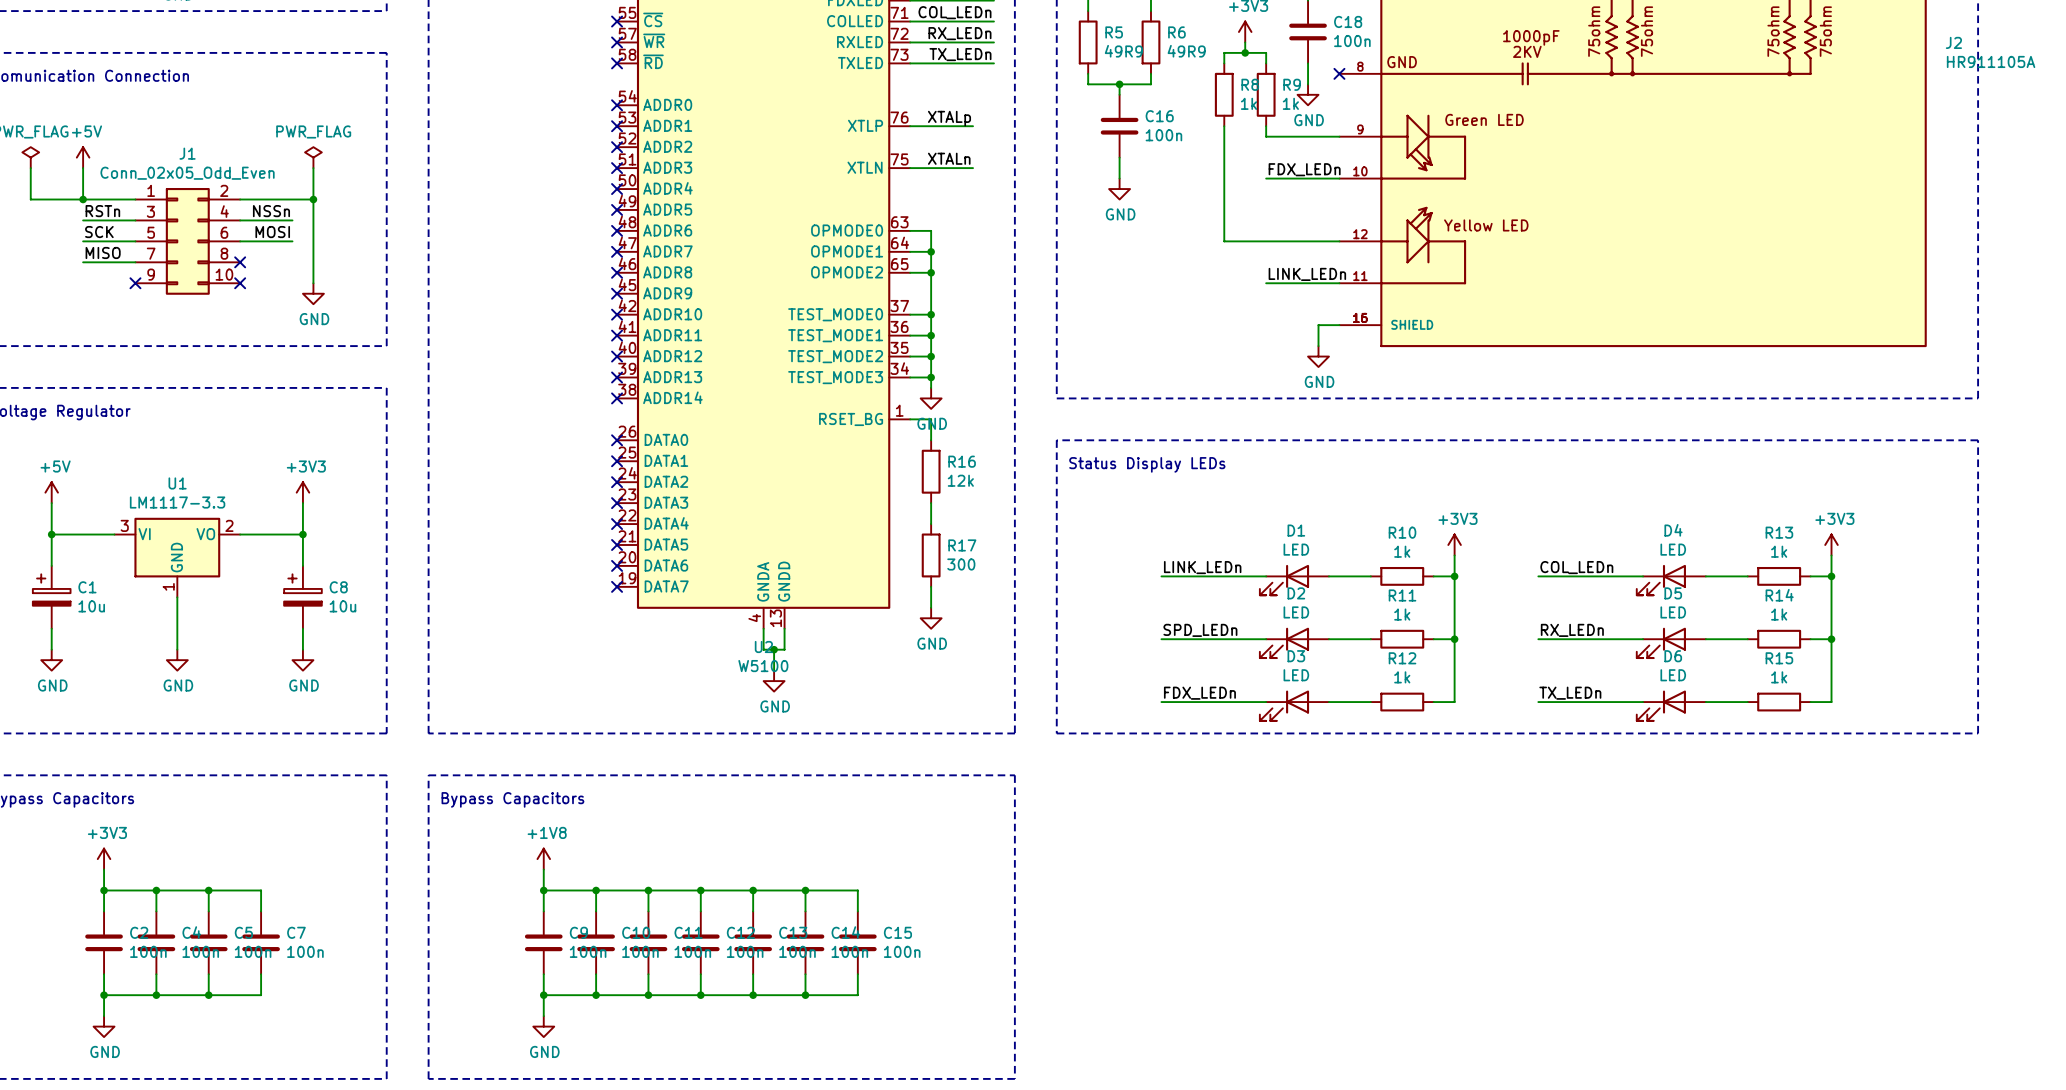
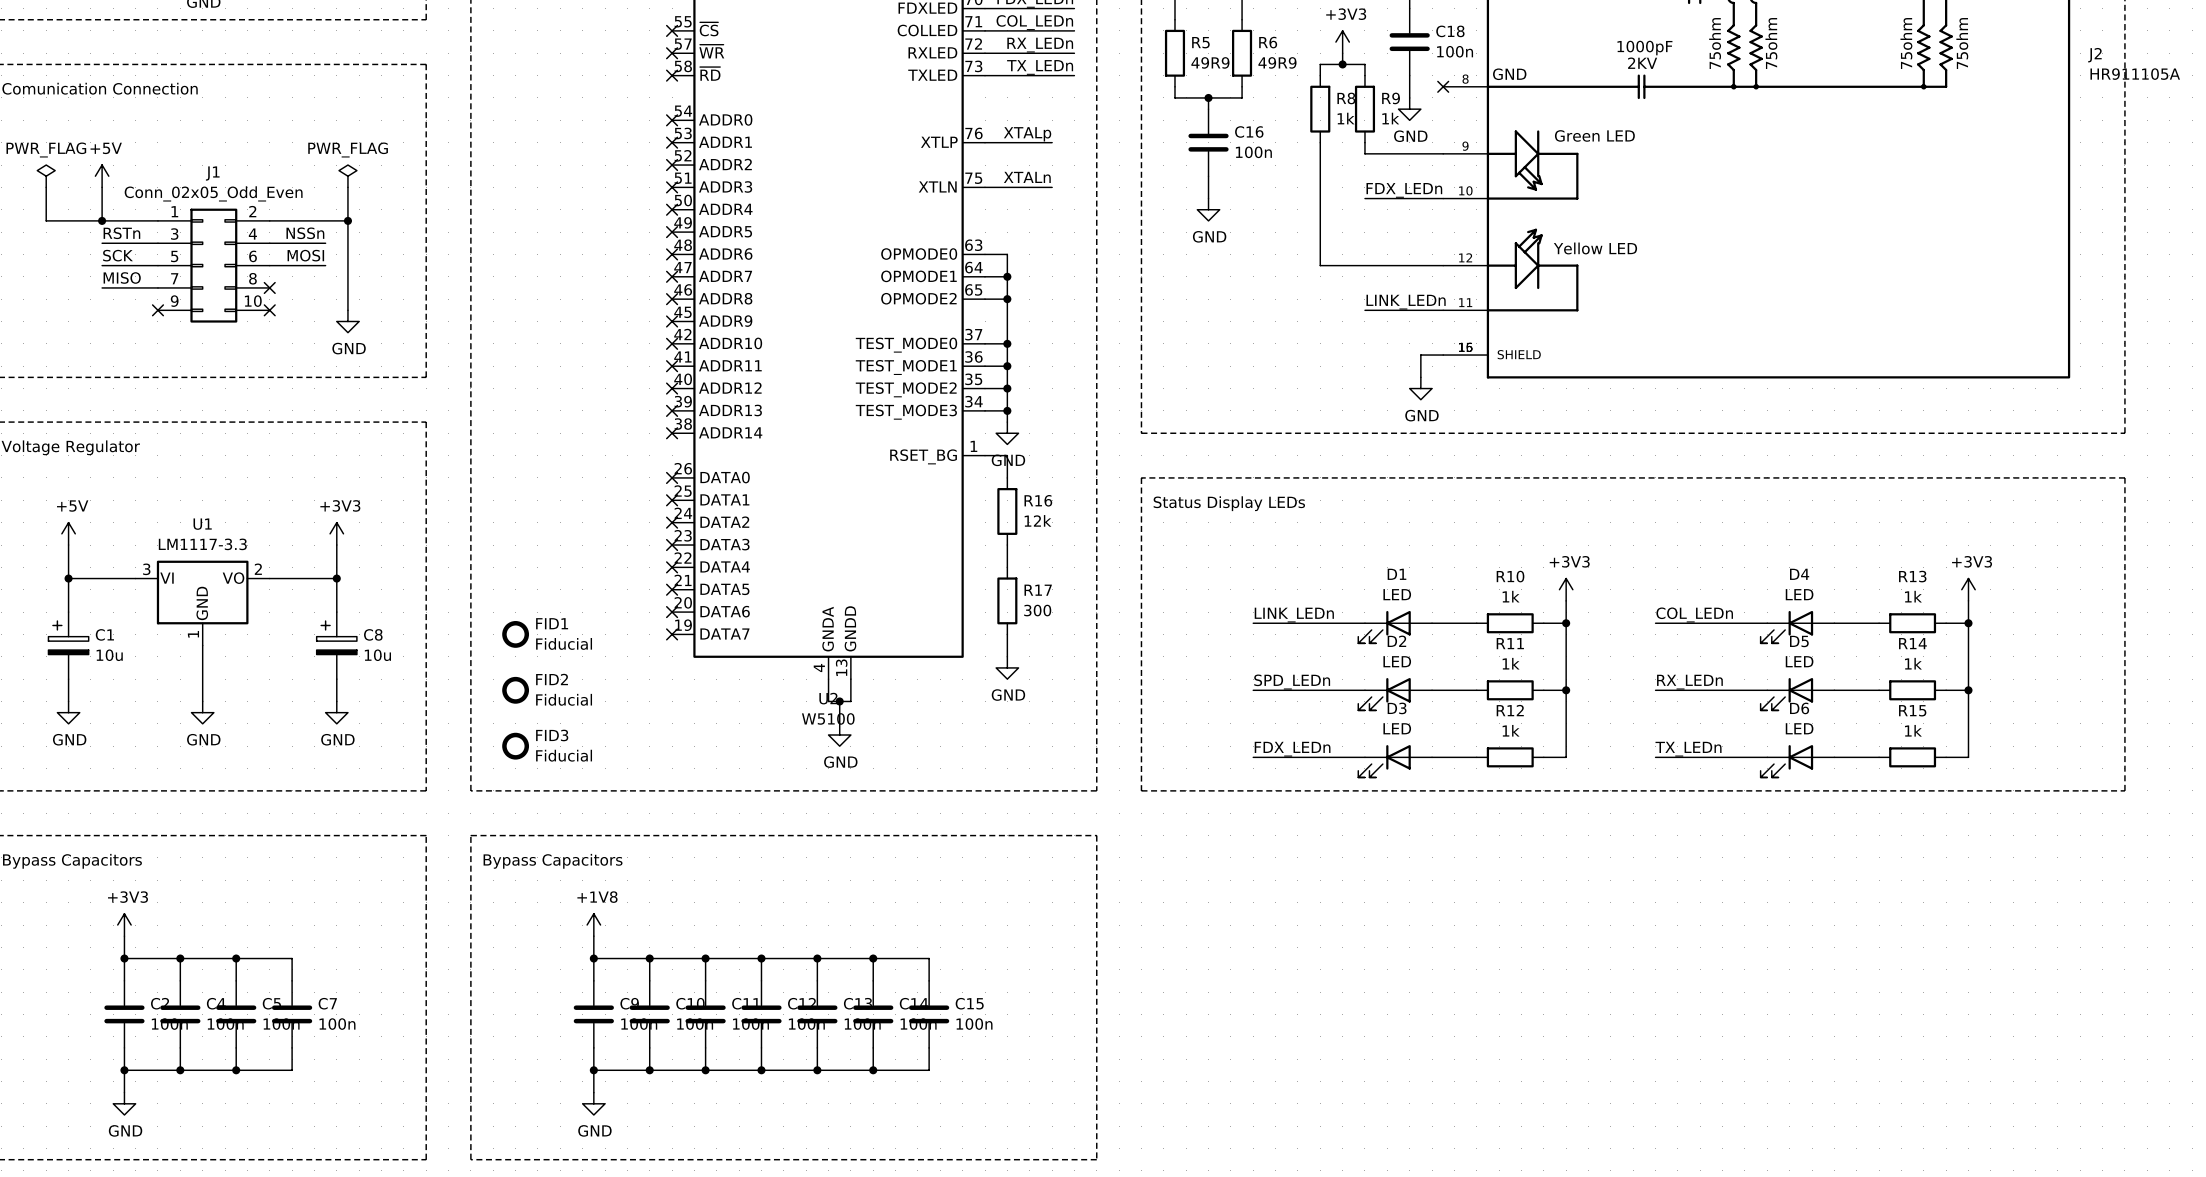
FID1: none -> Fiducial (515, 634)
FID2: none -> Fiducial (515, 690)
FID3: none -> Fiducial (515, 746)

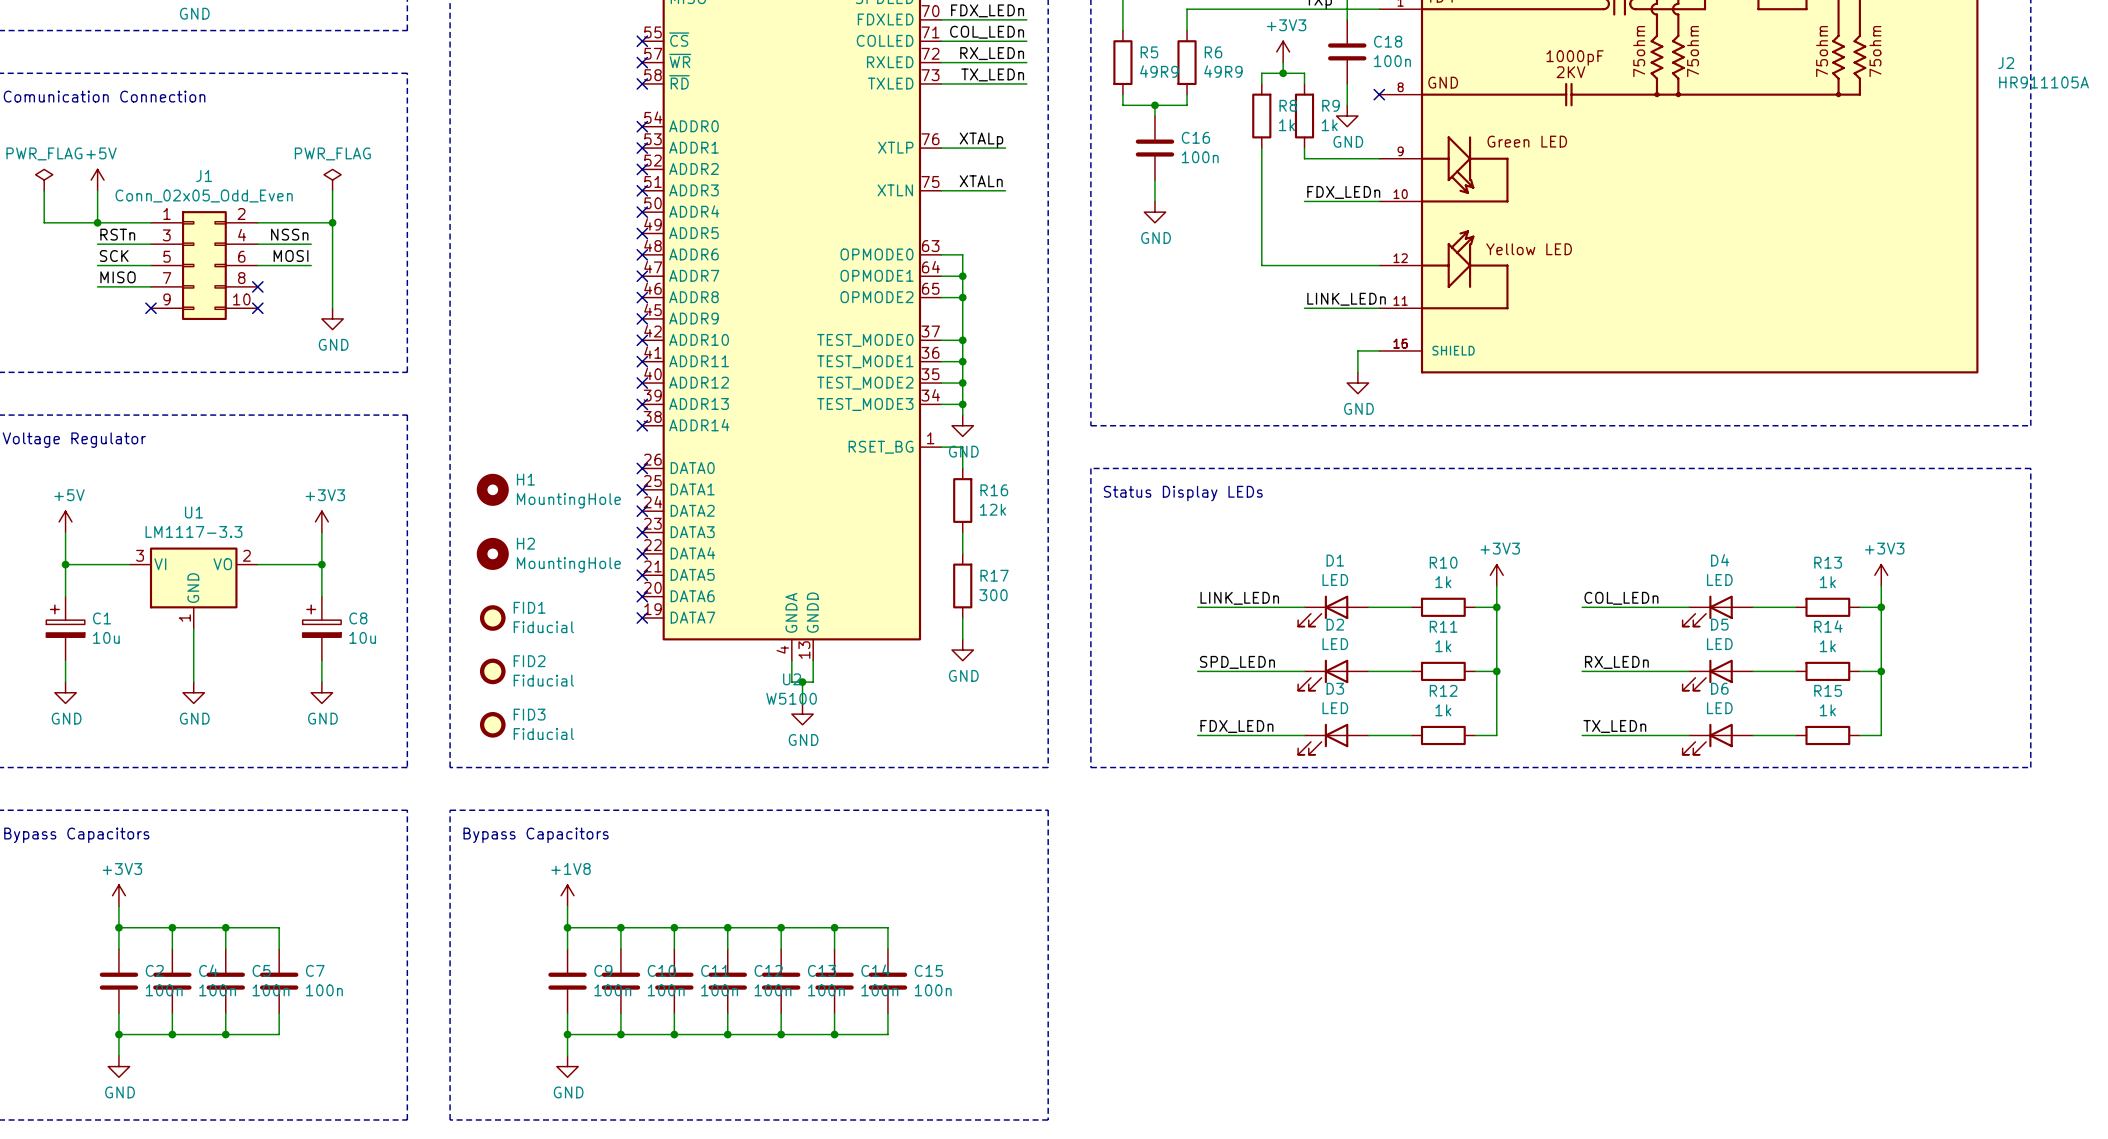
H1: none -> MountingHole (492, 489)
H2: none -> MountingHole (492, 553)

